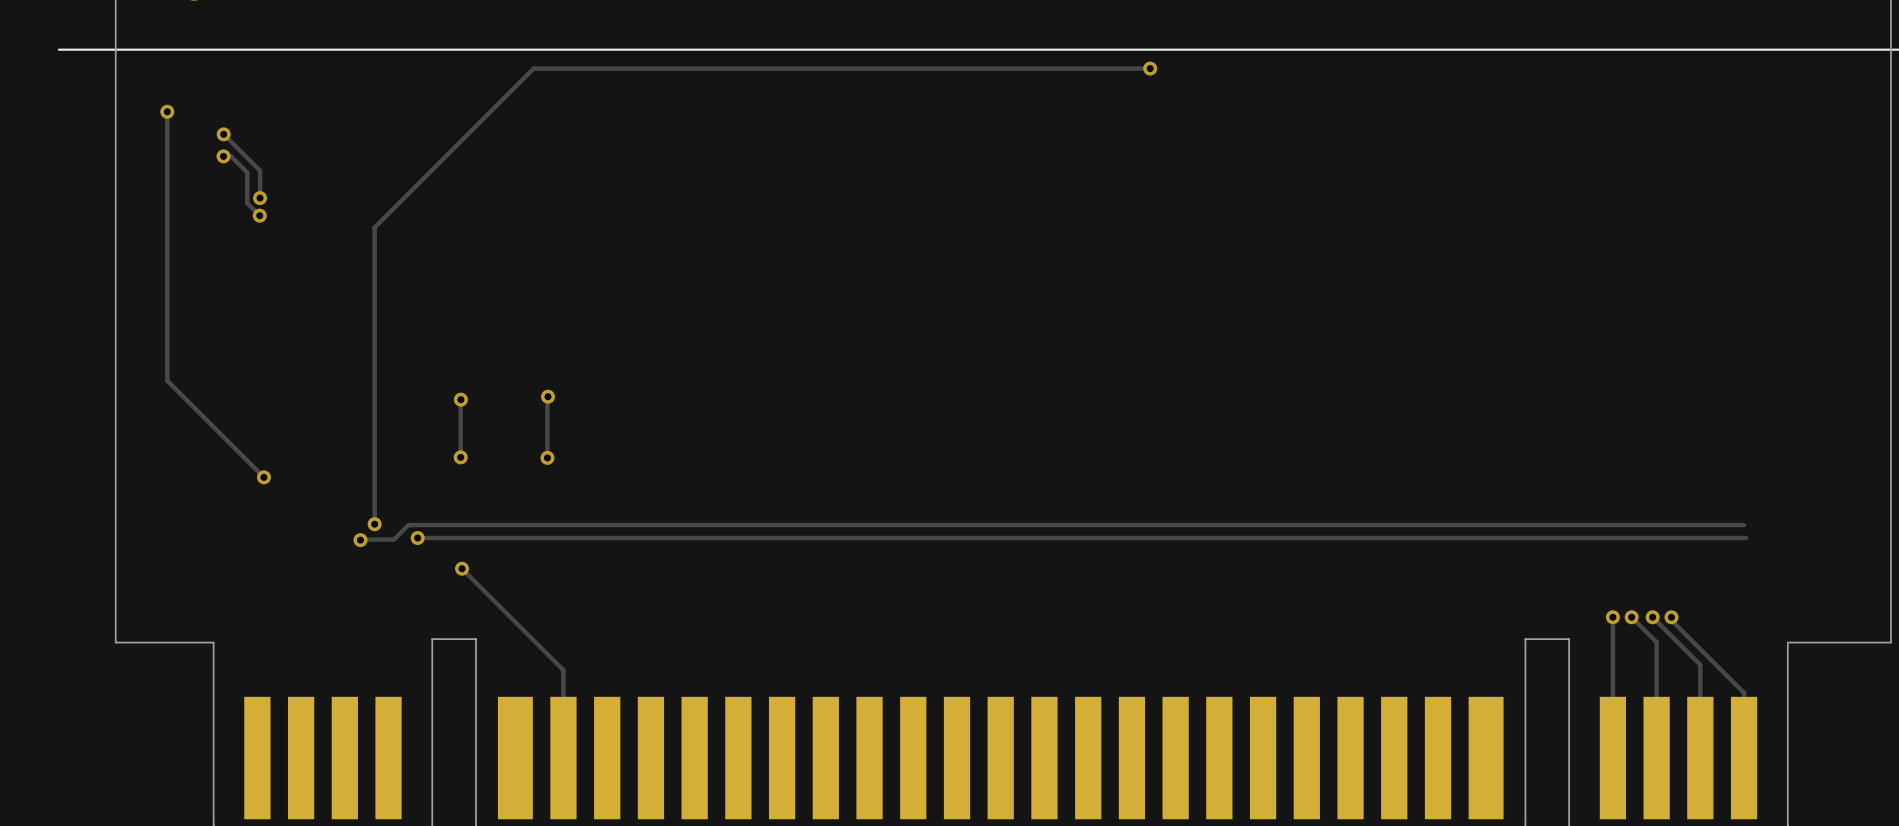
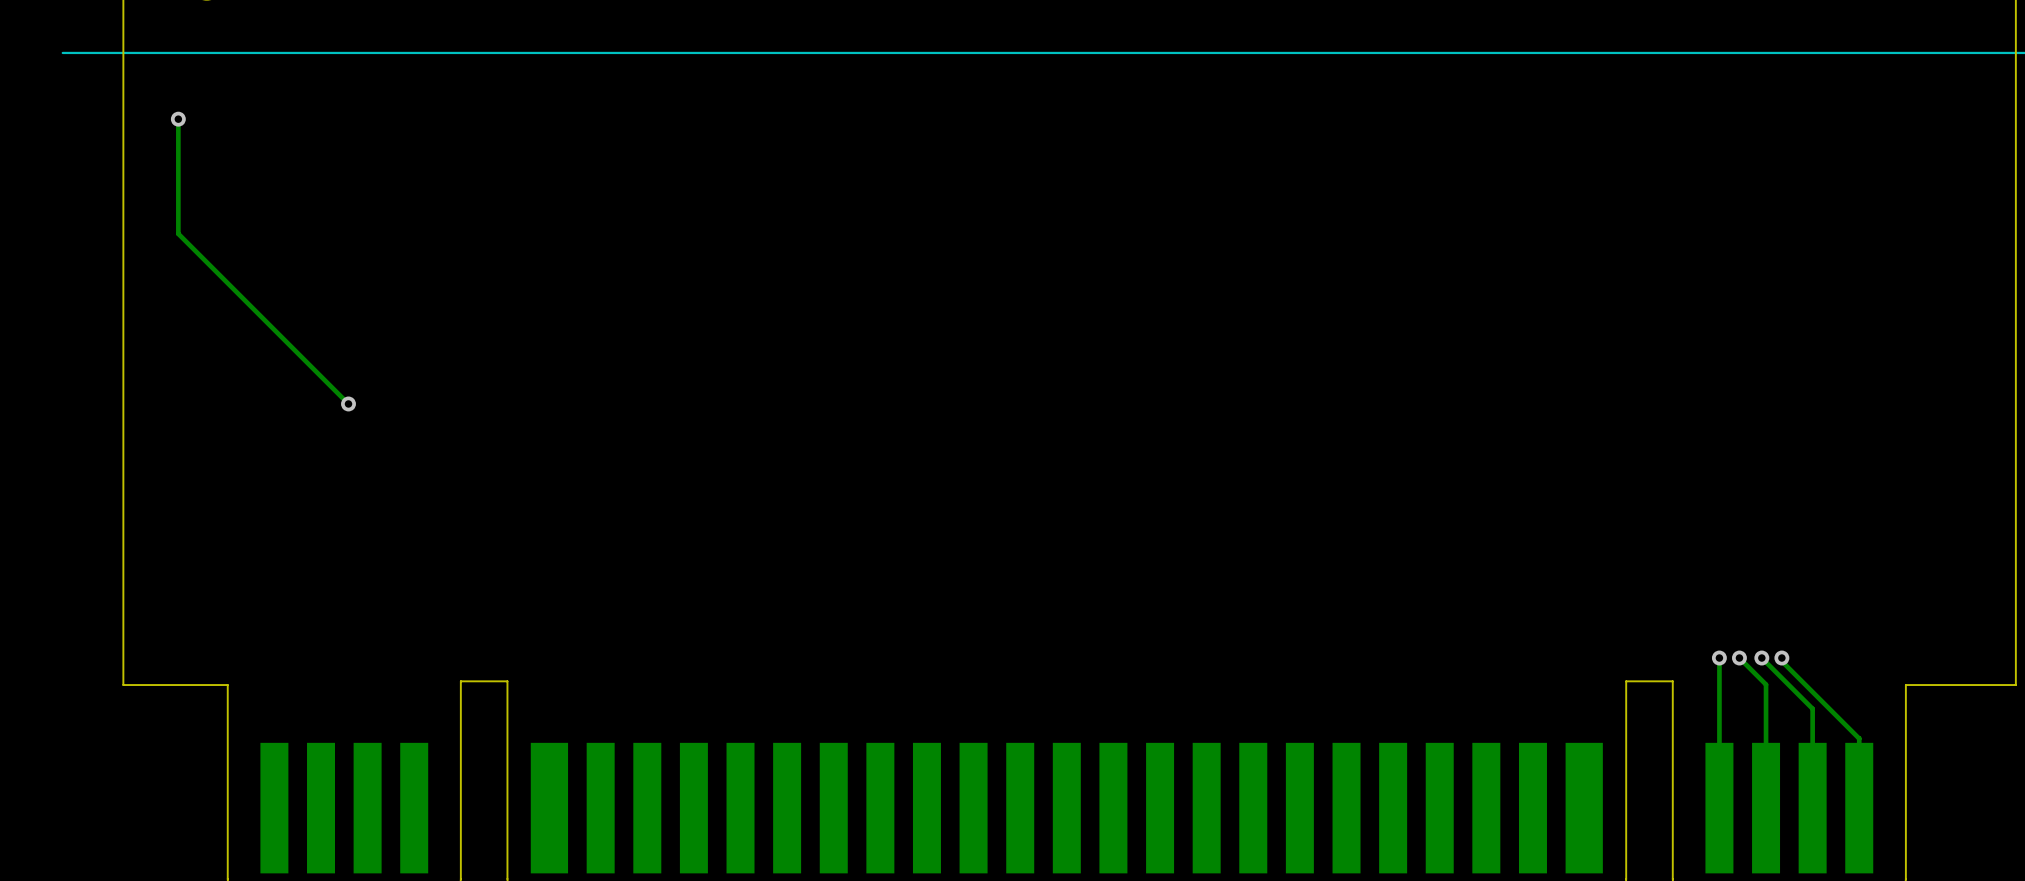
track: (1150, 68) (533, 68) (374, 227) (374, 524) -> none
via: (1150, 68) -> none
track: (223, 134) (260, 170) (260, 198) -> none
via: (223, 134) -> none
track: (223, 156) (231, 156) (247, 172) (247, 203) (259, 215) -> none
via: (223, 156) -> none
via: (260, 198) -> none
via: (259, 215) -> none
track: (167, 219) (167, 380) (263, 477) -> (178, 233) (348, 403)
via: none -> (348, 403)
track: (547, 396) (547, 457) -> none
via: (547, 396) -> none
track: (460, 399) (460, 457) -> none
via: (460, 399) -> none
via: (460, 457) -> none
via: (547, 457) -> none
via: (263, 477) -> none
via: (374, 524) -> none
track: (1743, 525) (408, 525) (393, 539) (360, 540) -> none
via: (417, 538) -> none
track: (1746, 538) (417, 538) -> none
via: (360, 540) -> none
track: (462, 568) (563, 670) (563, 758) -> none
via: (462, 568) -> none

